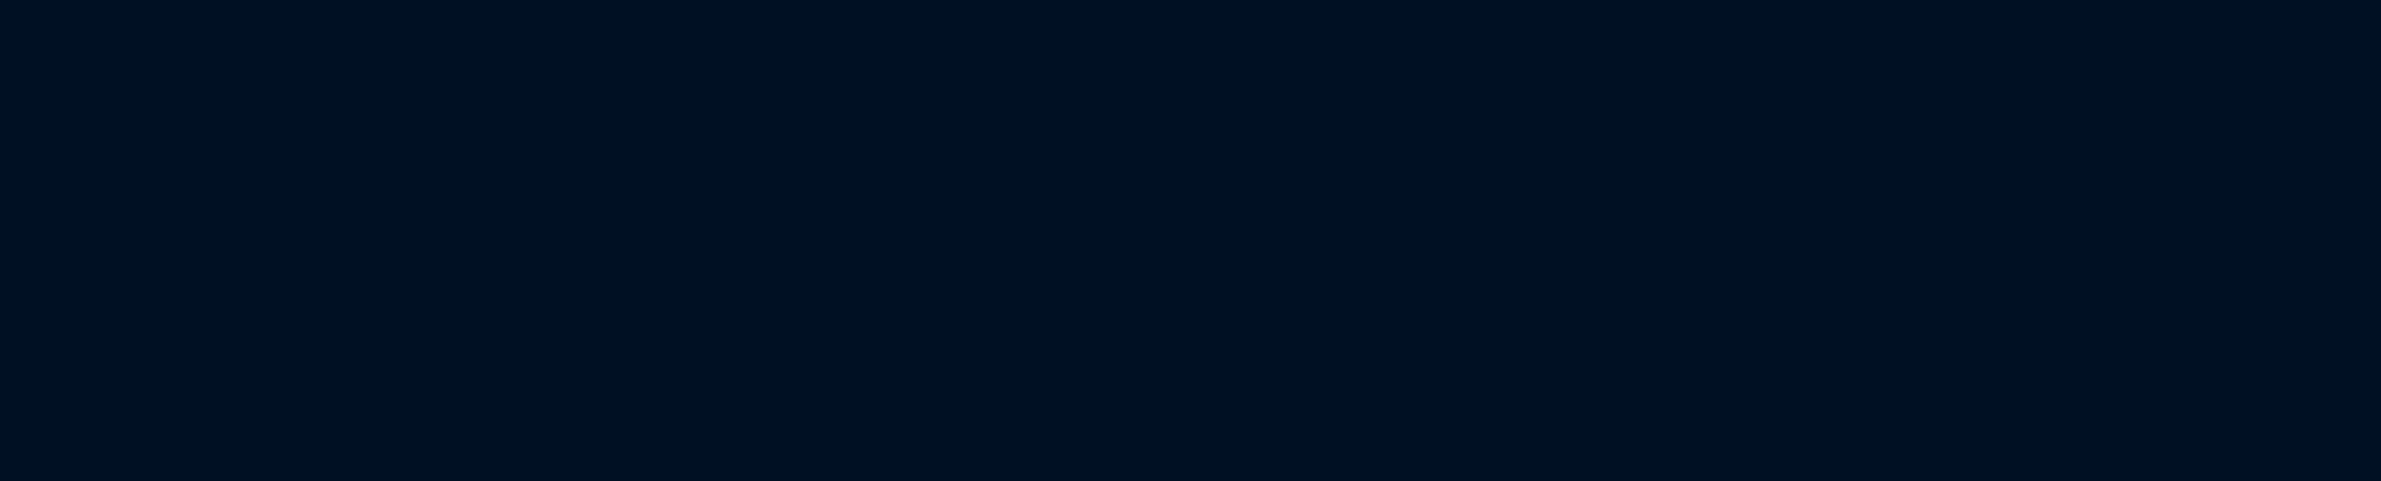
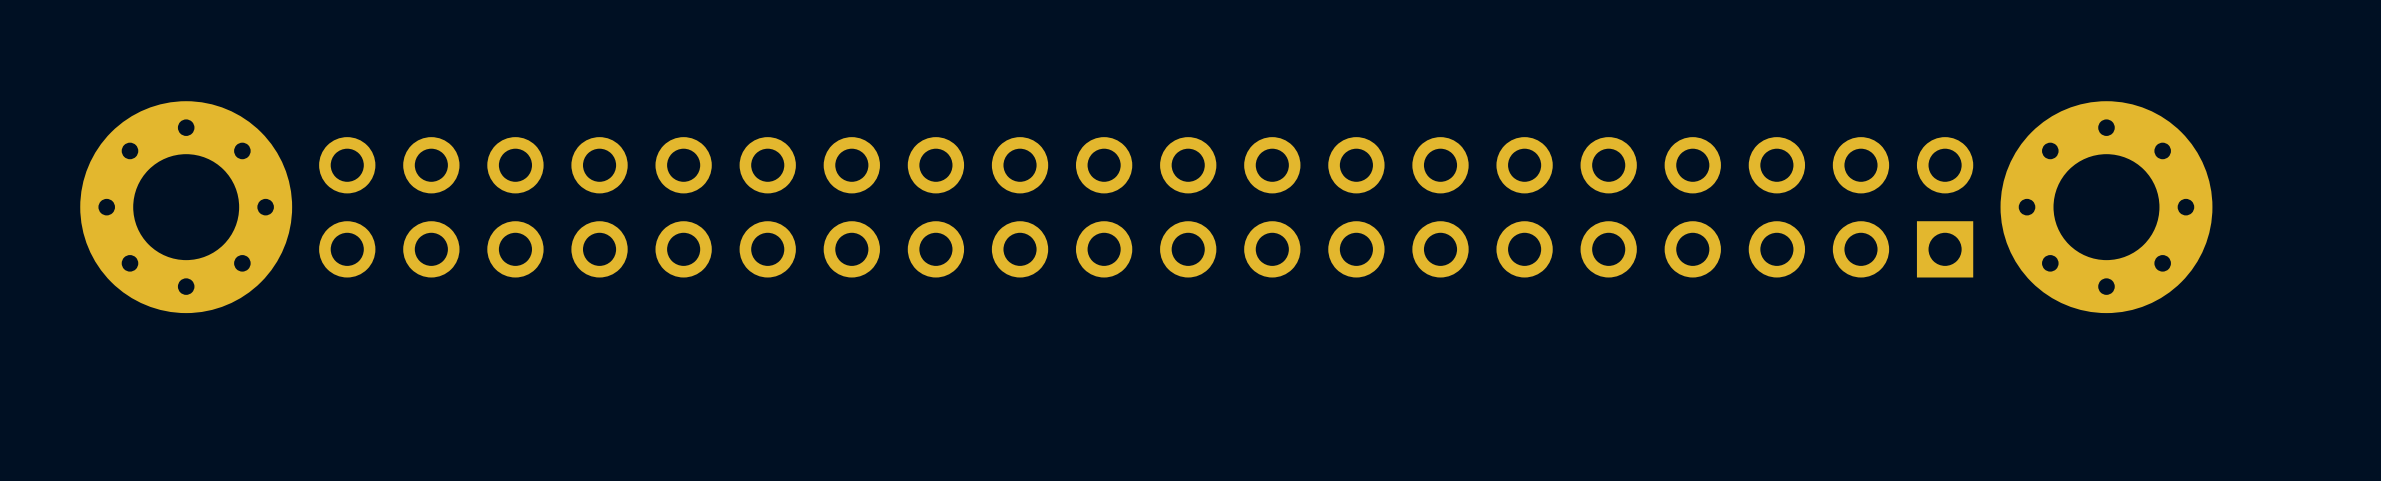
part: none -> (186, 207)
part: none -> (1146, 207)
part: none -> (2106, 207)

